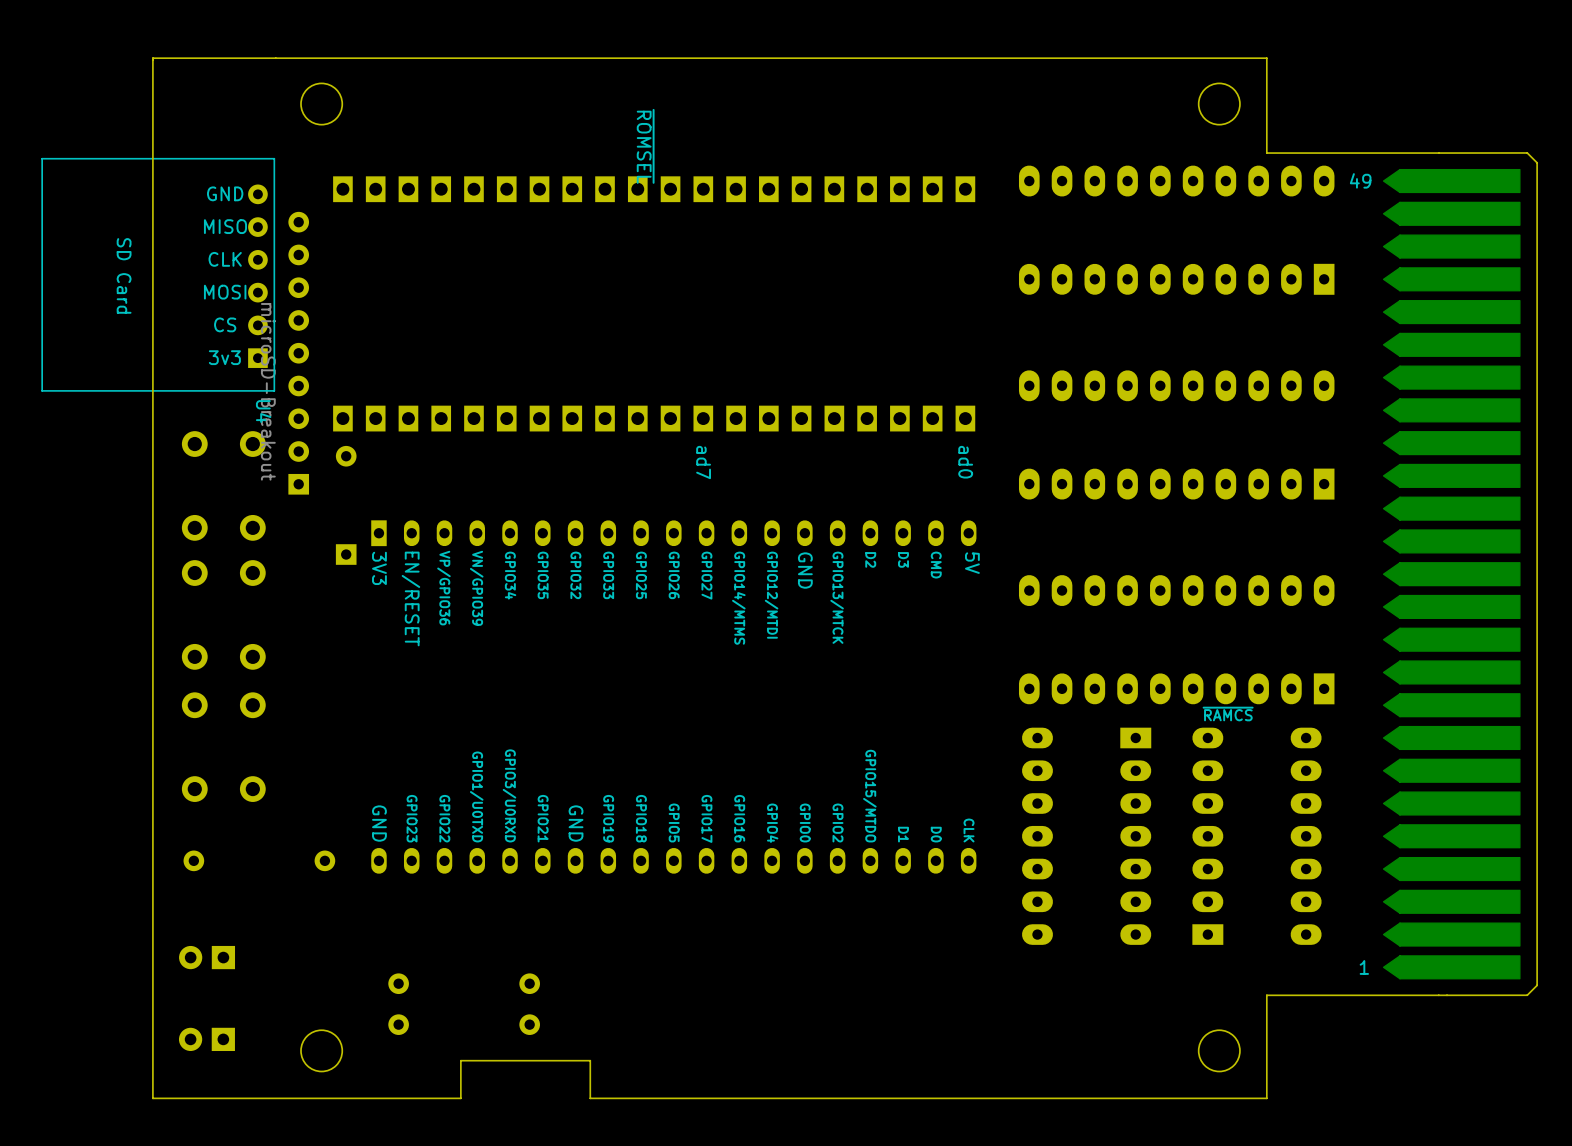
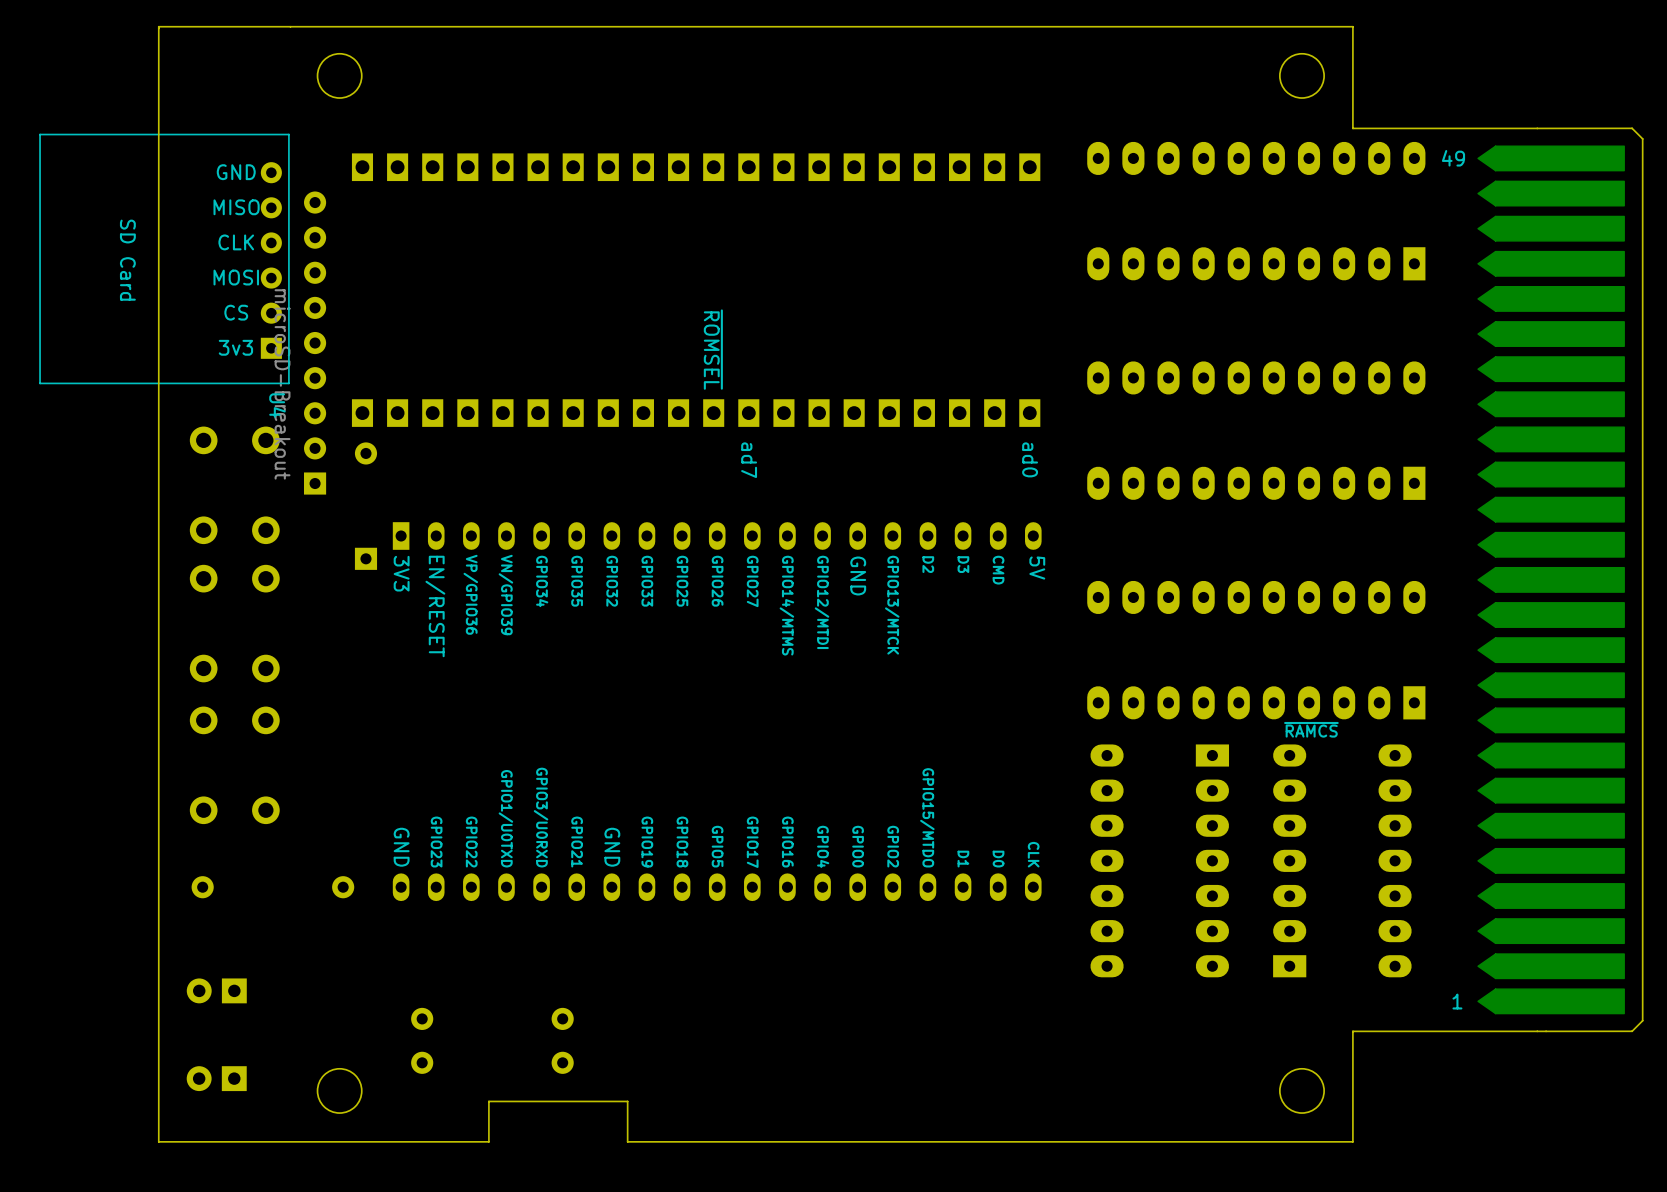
text position: ~{ROMSEL} (645, 146) -> ~{ROMSEL} (713, 349)

